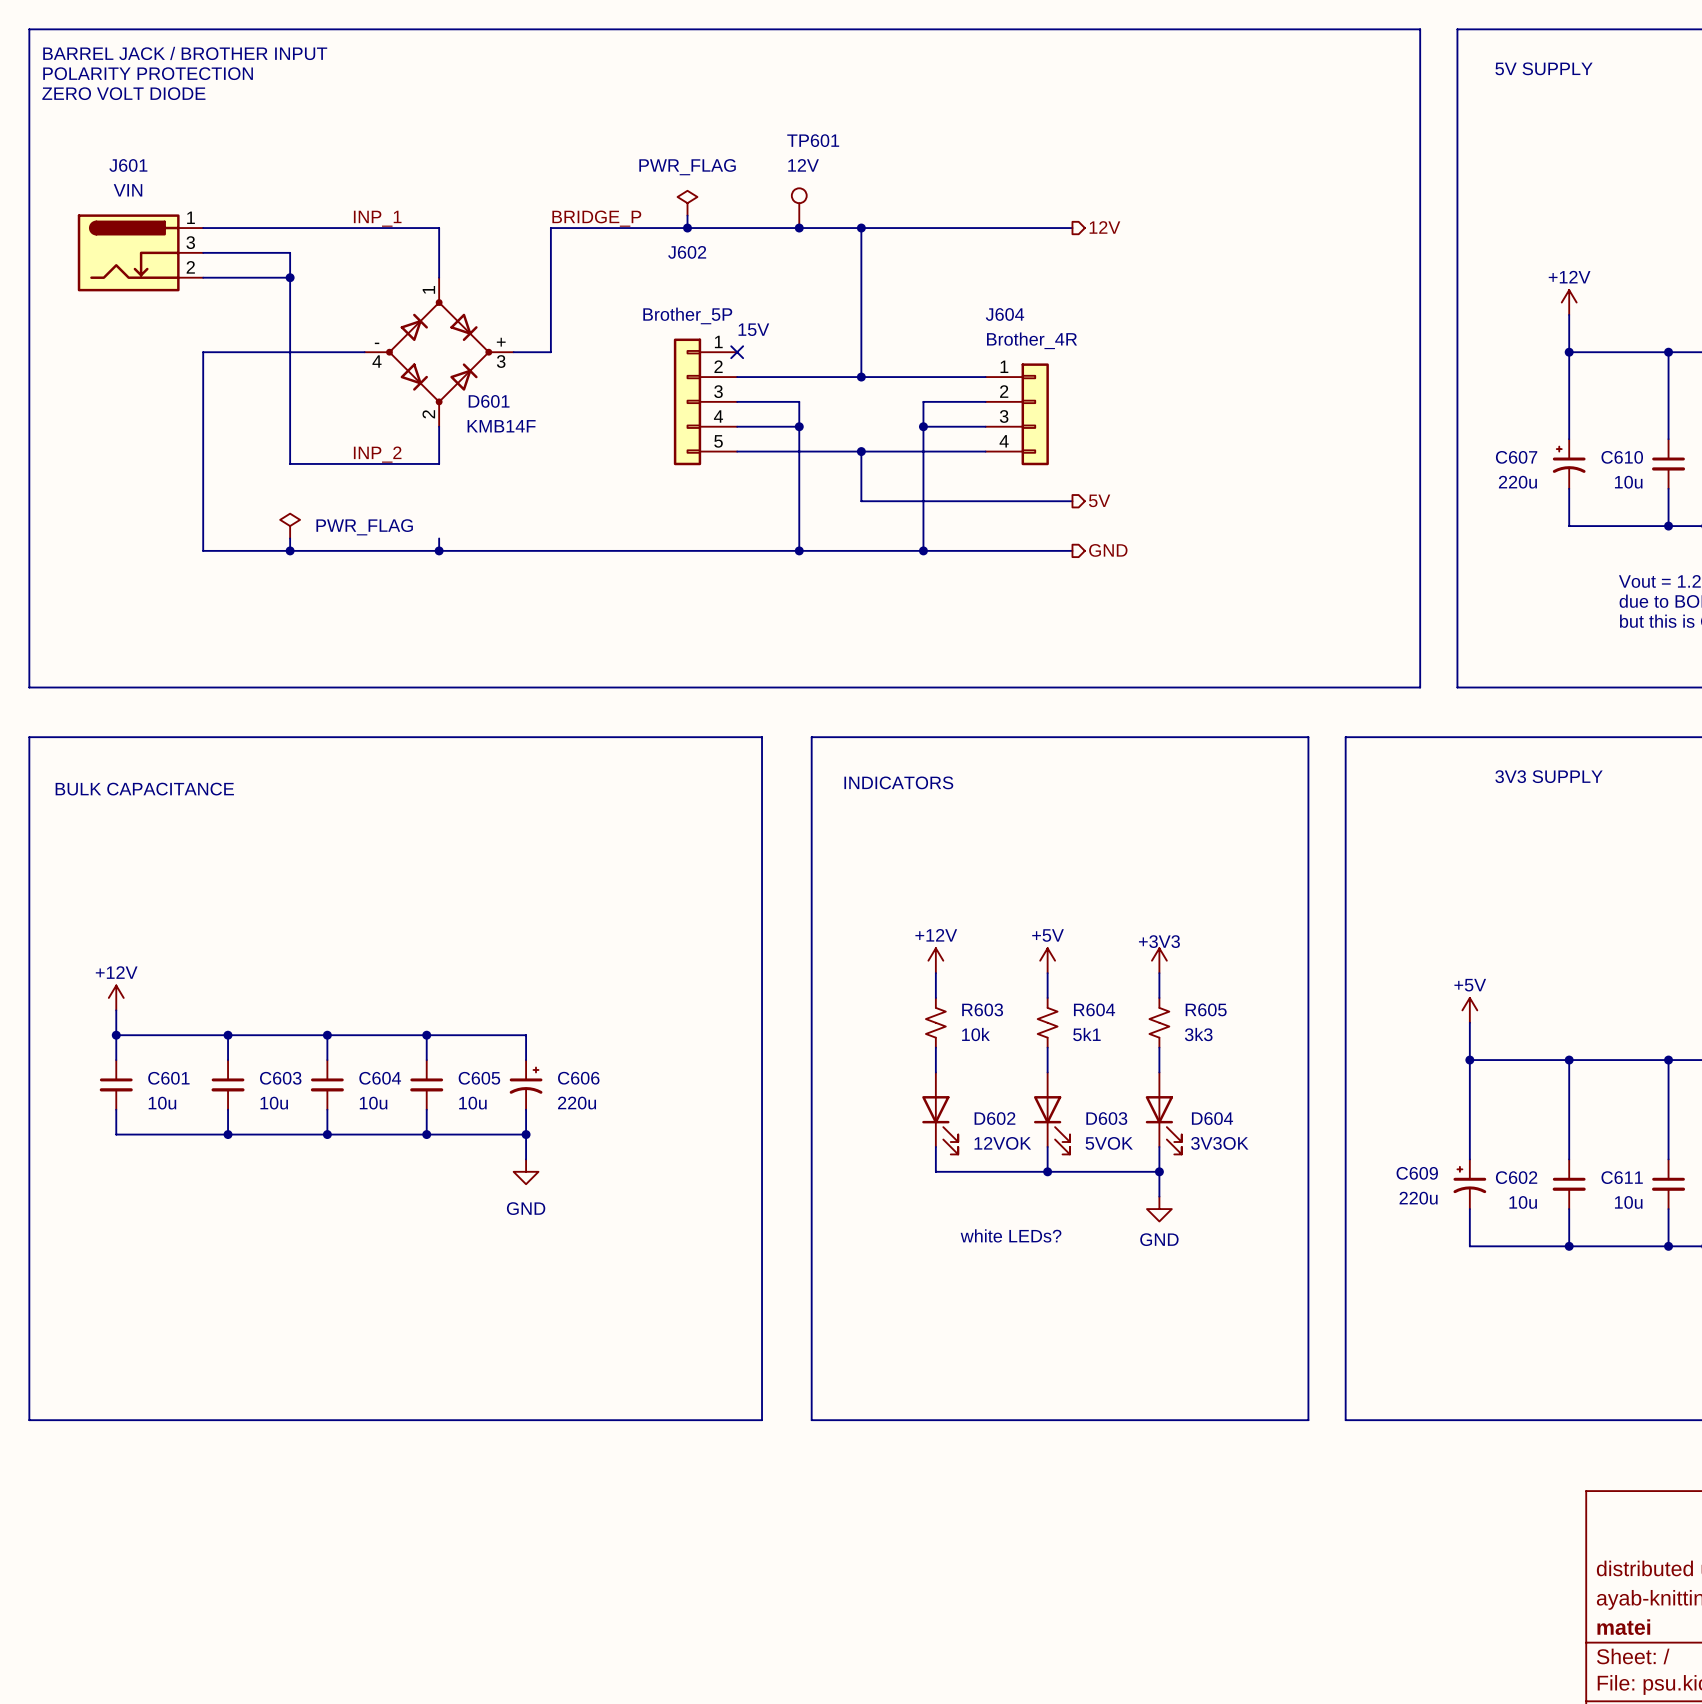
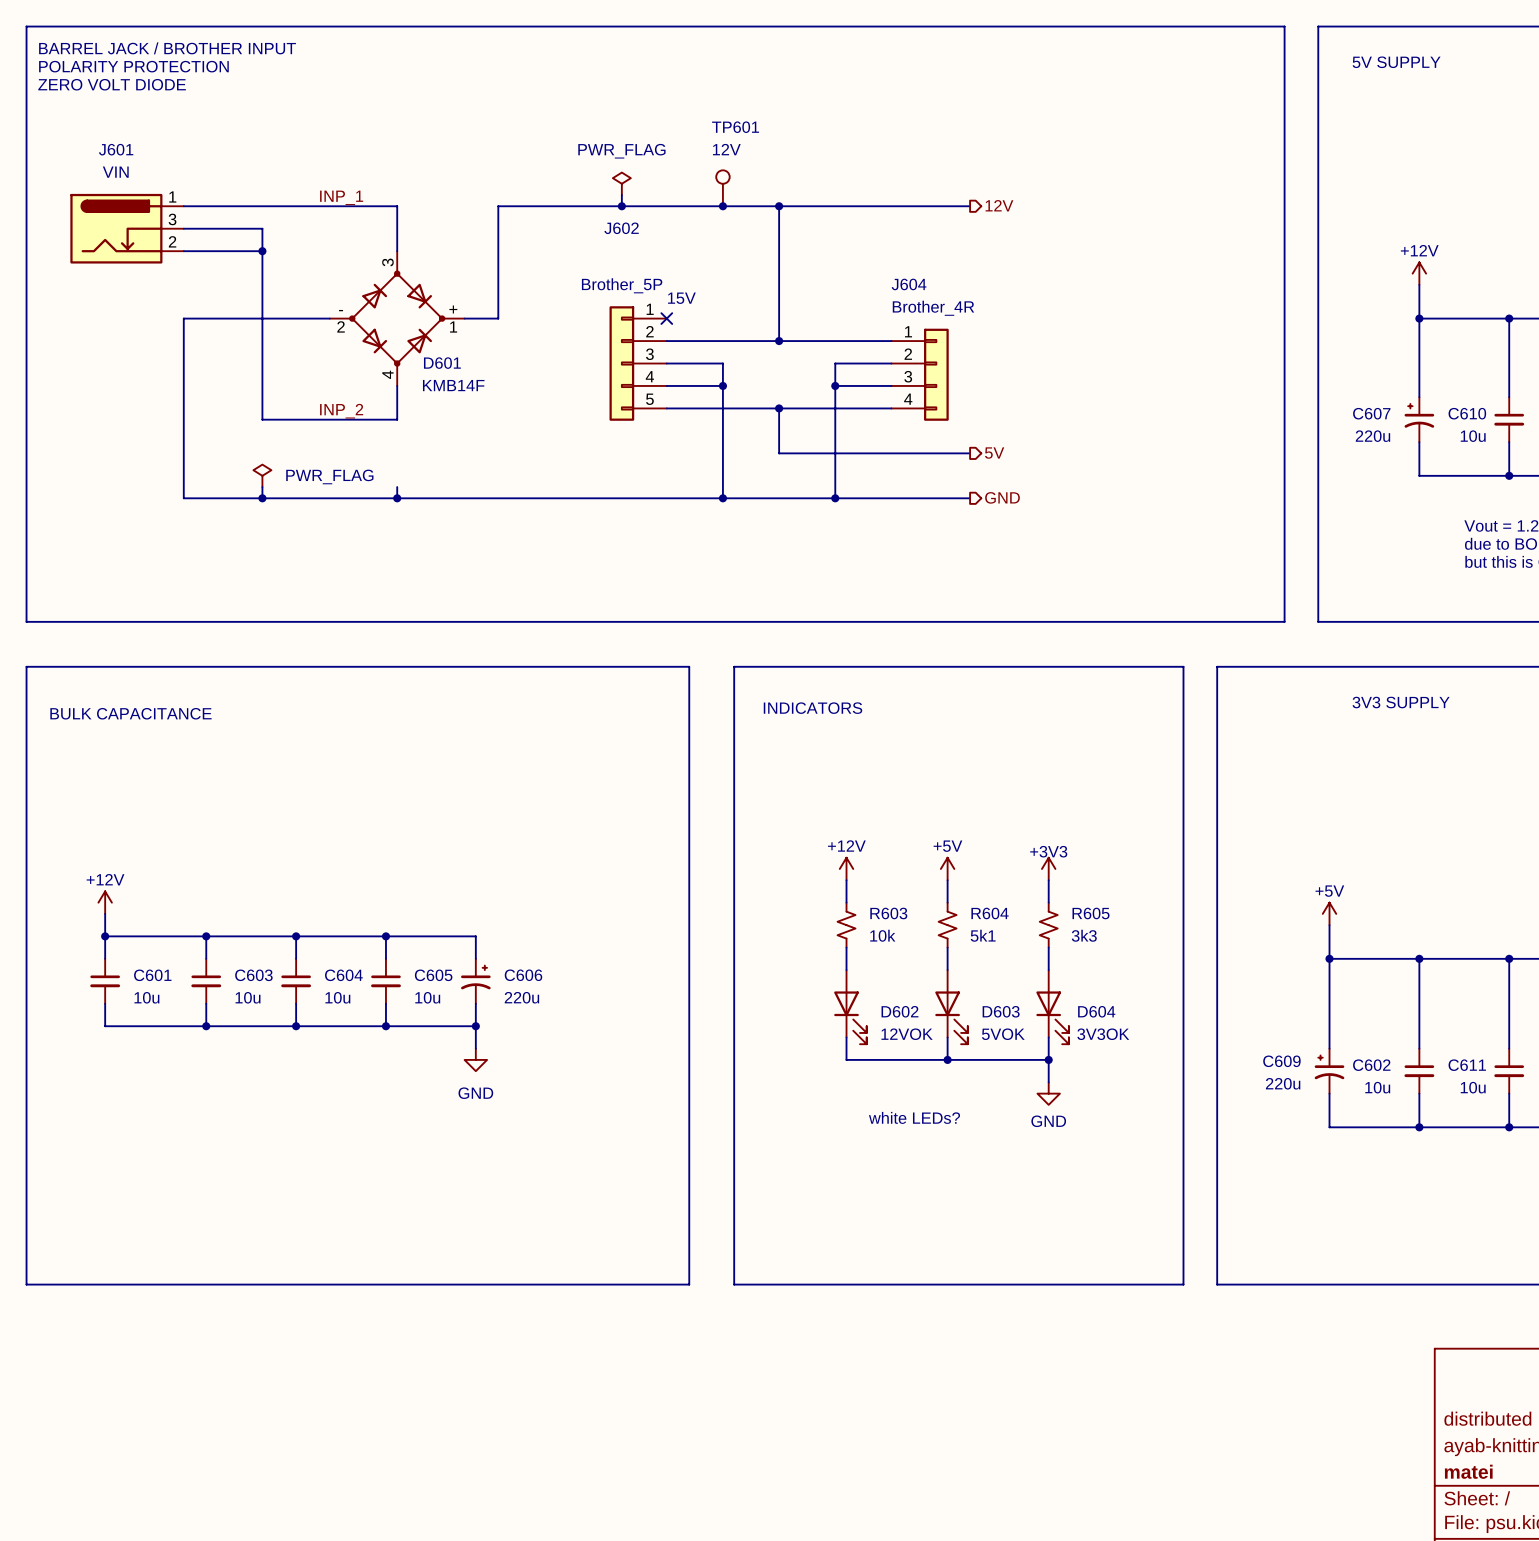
label: BRIDGE_P (596, 218) -> none
D601 pin number: 1 (428, 289) -> 3 (387, 262)
D601 pin number: 4 (376, 361) -> 2 (341, 326)
D601 pin number: 3 (501, 361) -> 1 (453, 327)
D601 pin number: 2 (428, 414) -> 4 (387, 374)

